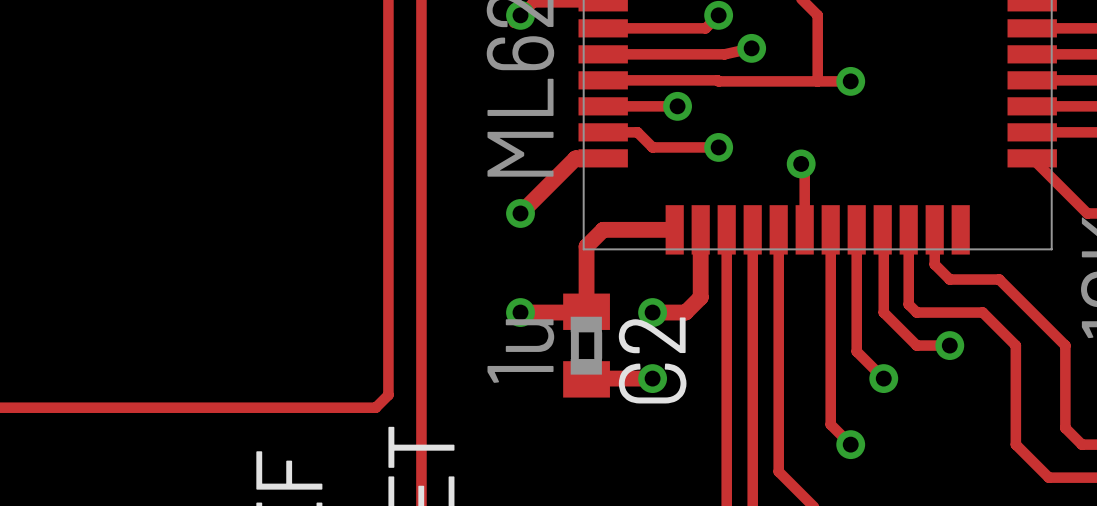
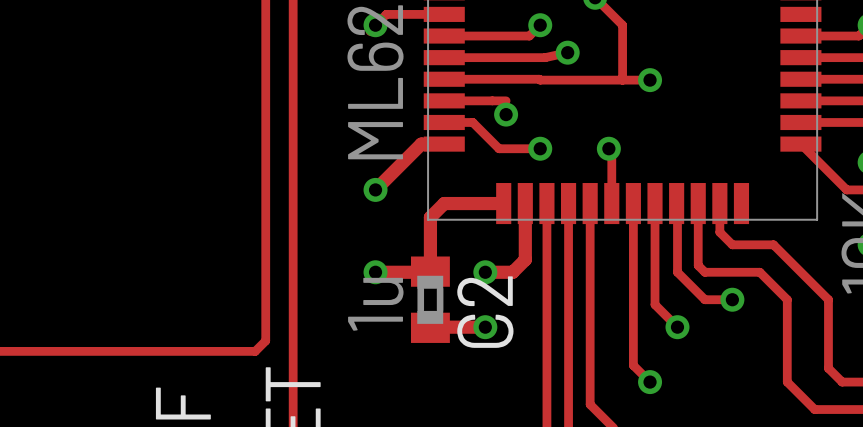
via position: (677, 106) -> (506, 114)
track: (652, 147) (718, 147) -> (485, 135) (499, 148) (540, 148)
via position: (718, 147) -> (540, 148)

